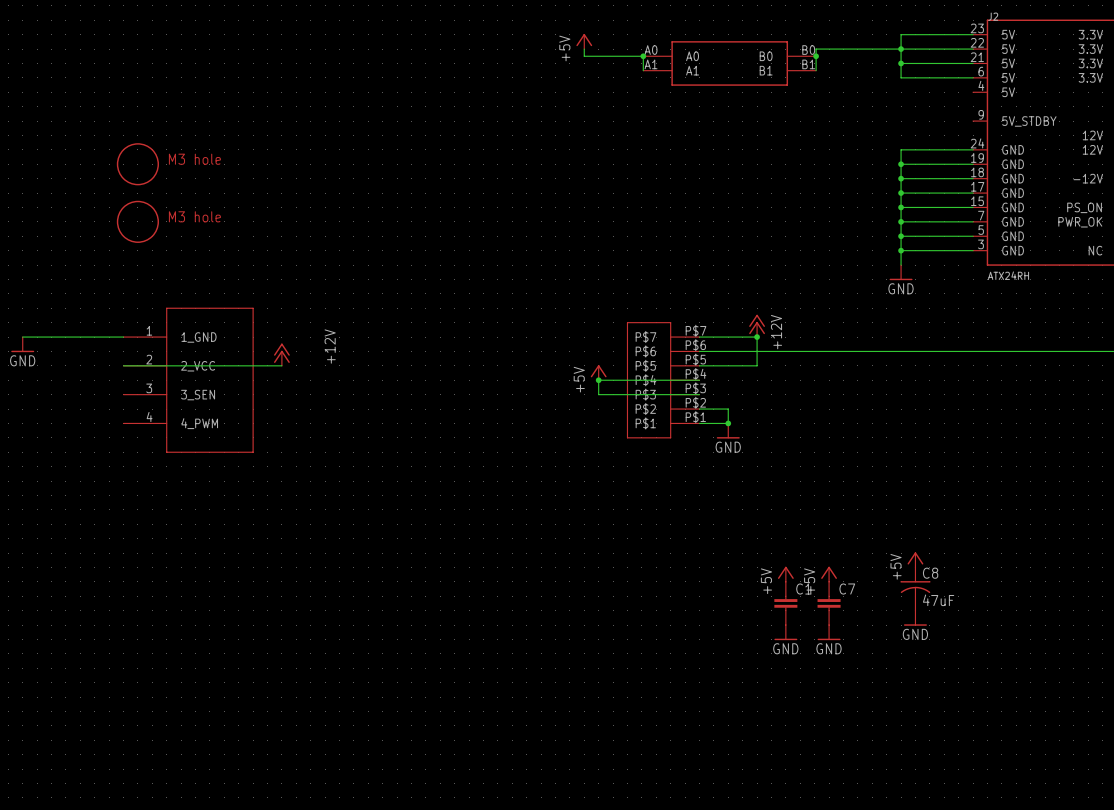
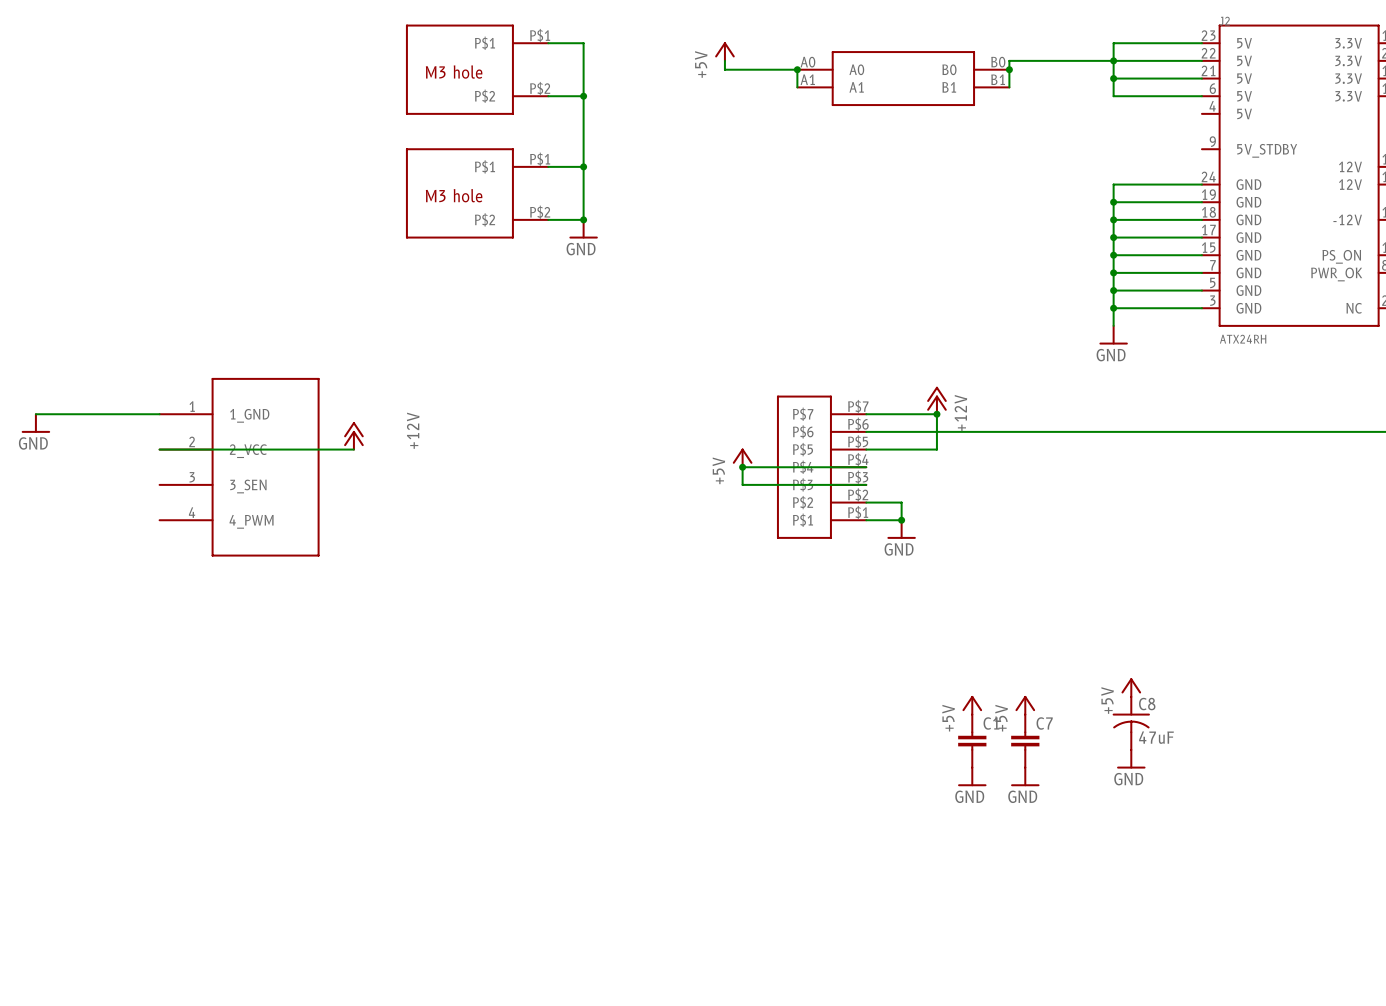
wire: none -> (548, 43) (583, 43) (583, 219) (548, 219)
part: none -> (477, 69)
wire: none -> (548, 96) (583, 96)
junction: none -> (583, 96)
wire: none -> (548, 166) (583, 166)
junction: none -> (583, 166)
part: none -> (477, 193)
part: (137, 164) -> none
junction: none -> (583, 219)
power symbol: none -> GND (583, 229)
part: (137, 221) -> none

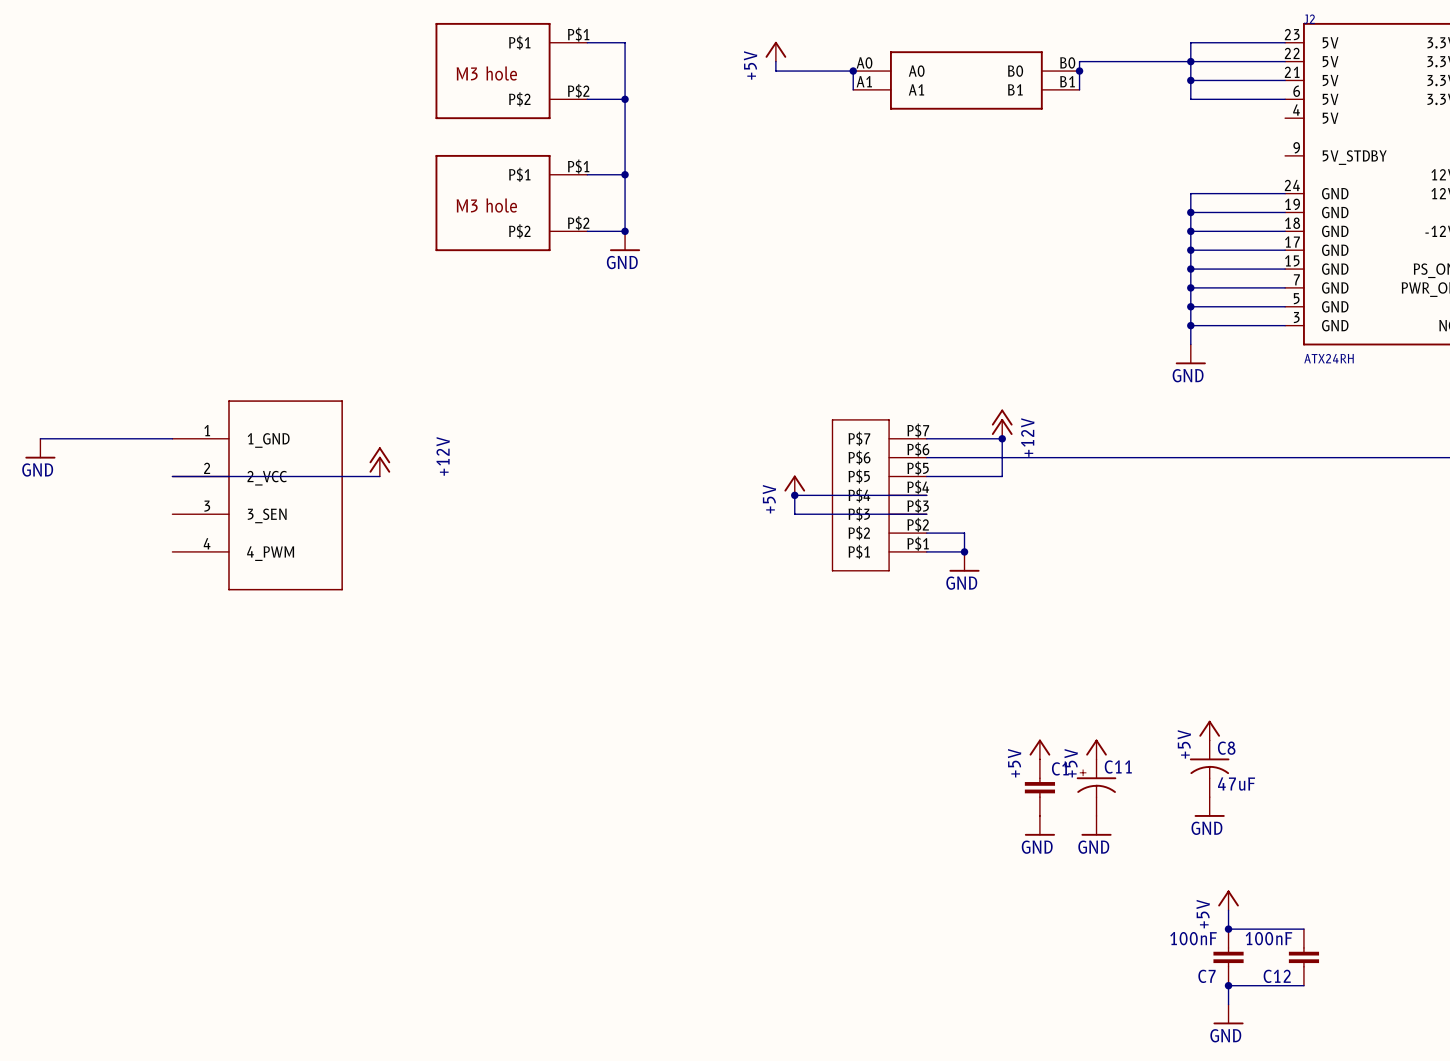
C7 name position: C7 (1044, 723) -> C7 (1207, 976)
C7 position: (1025, 741) -> (1228, 957)
C11: none -> (1096, 787)
power symbol: none -> +5V (1228, 900)
wire: none -> (1228, 910) (1228, 929) (1303, 929)
junction: none -> (1228, 929)
C7 value: none -> 100nF (1193, 938)
C12: none -> 100nF (1303, 957)
junction: none -> (1228, 985)
wire: none -> (1303, 985) (1228, 985) (1228, 1004)
power symbol: none -> GND (1228, 1014)

